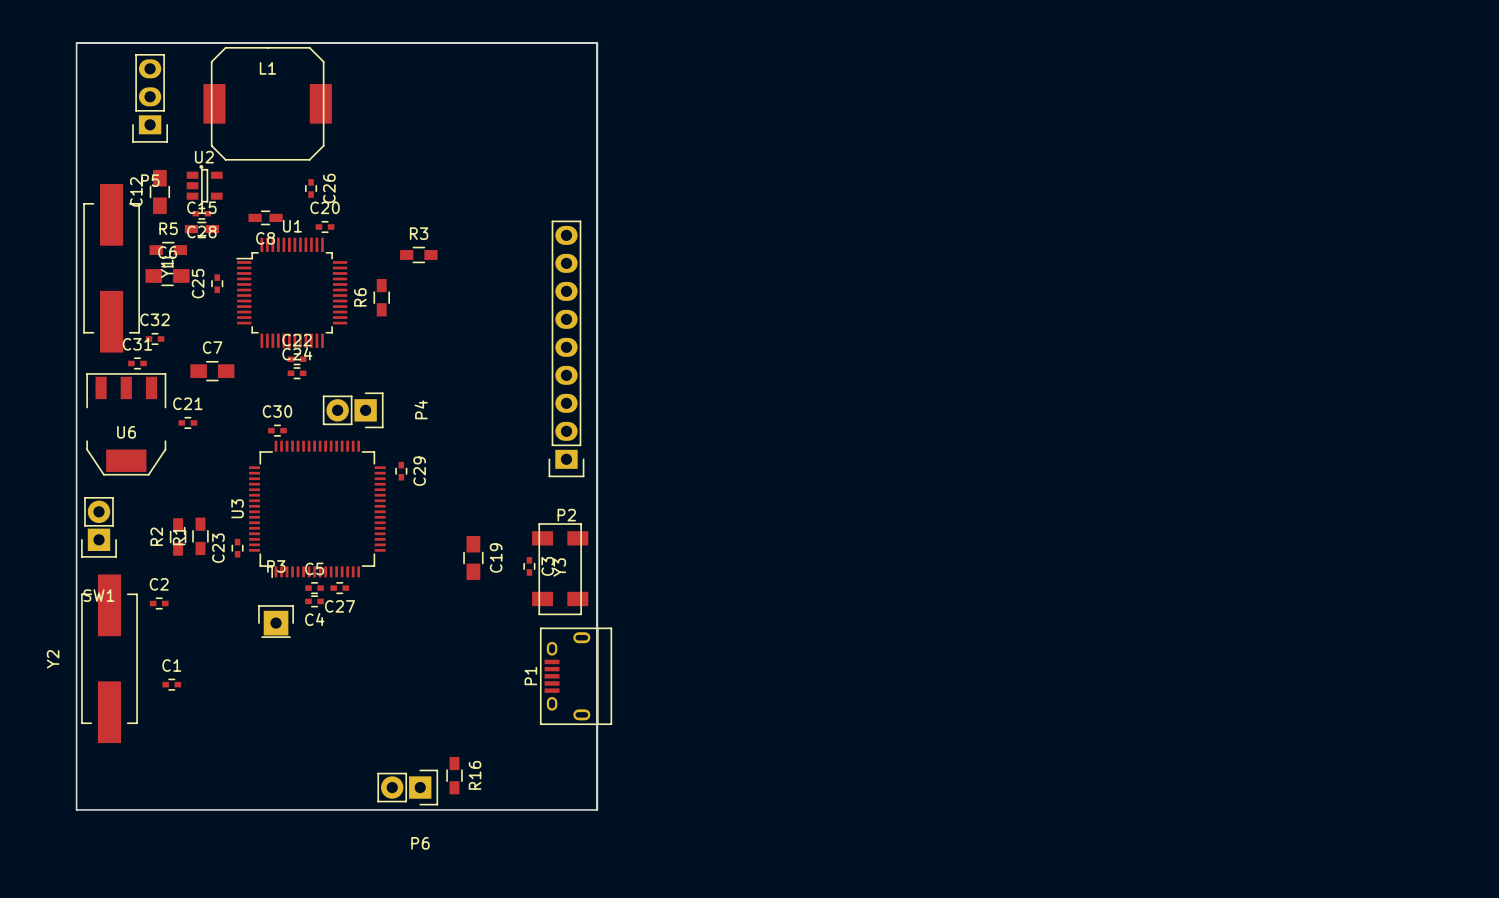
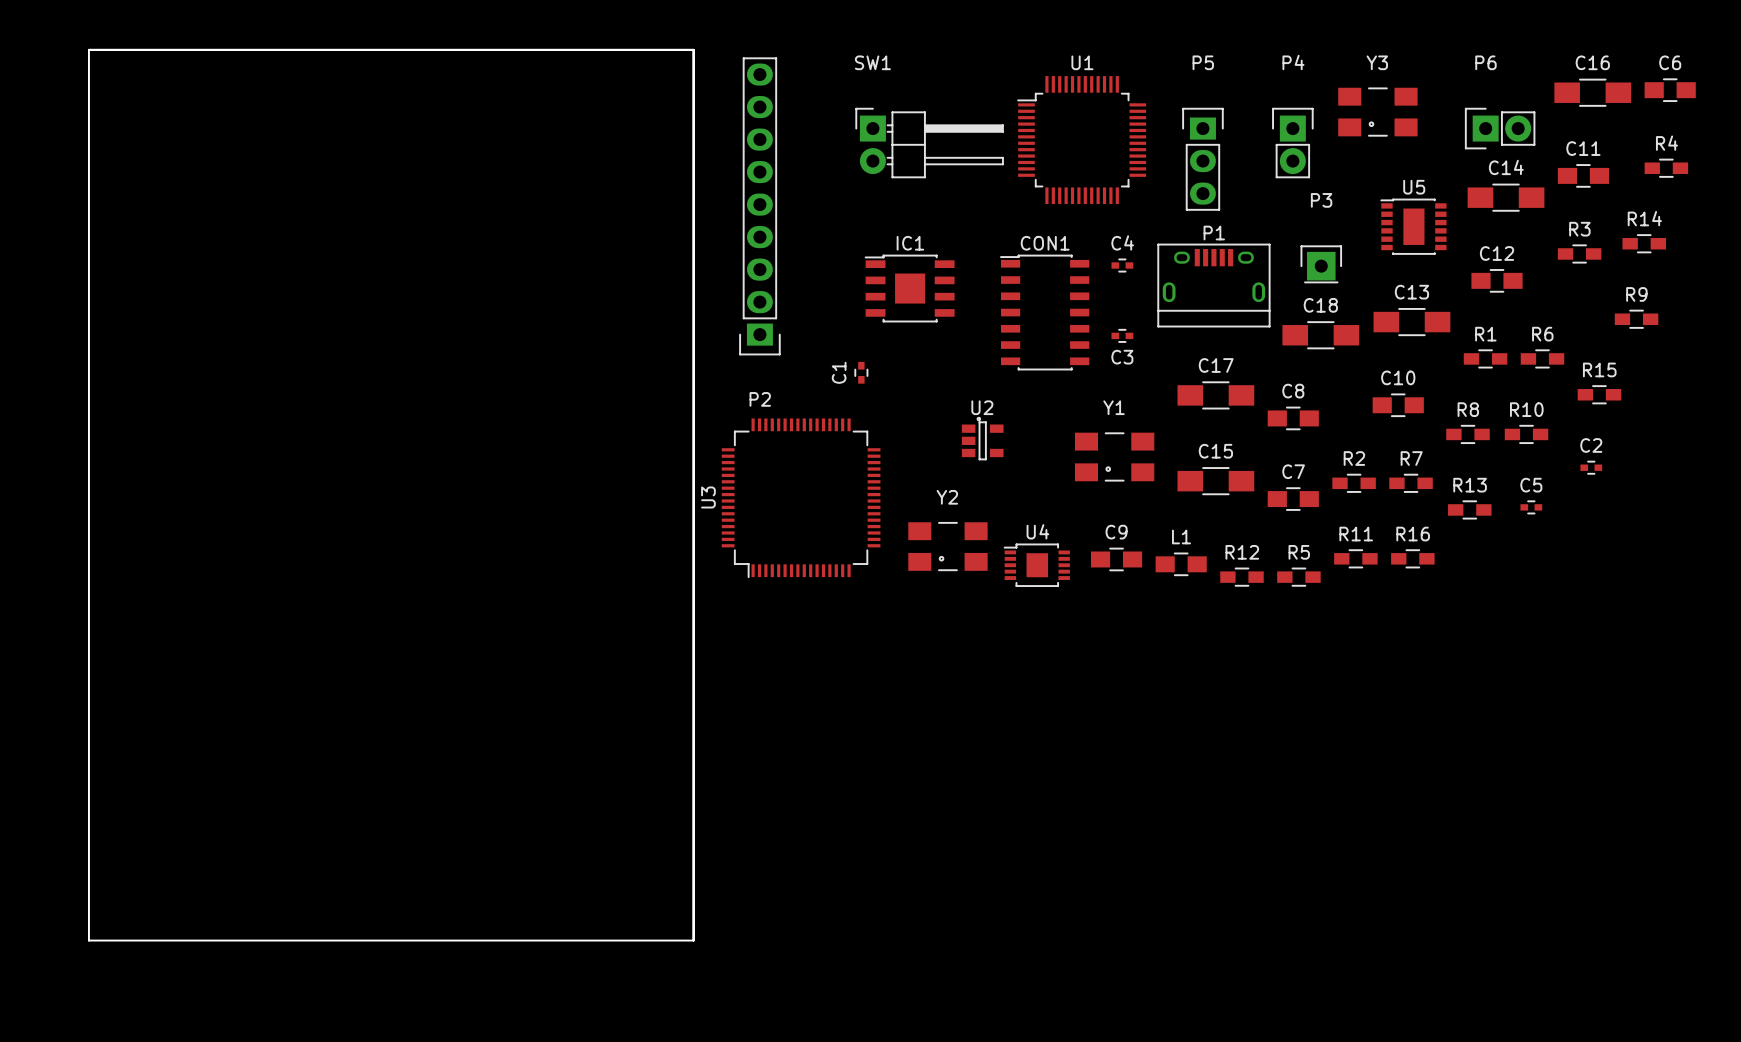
L1 footprint: [203, 47, 332, 161] -> [1155, 552, 1207, 577]
C16: none -> (1592, 92)
P5 rotation: 0° (150, 98) -> 180° (1202, 159)
P5 position: (150, 98) -> (1202, 159)
R4: none -> (1666, 168)
C11: none -> (1583, 175)
C14: none -> (1506, 197)
Y1 footprint: [83, 183, 140, 353] -> [1074, 432, 1155, 482]
U2 position: (204, 183) -> (982, 438)
C26: (311, 188) -> none
C12 rotation: 0° (159, 191) -> 90° clockwise (1497, 280)
C12 position: (159, 191) -> (1497, 280)
U5: none -> (1413, 226)
R14: none -> (1644, 243)
C8 footprint: [248, 210, 283, 226] -> [1267, 406, 1319, 431]
C28: (201, 213) -> none
C15 footprint: [184, 221, 219, 237] -> [1177, 467, 1255, 496]
C20: (325, 226) -> none
C8 name position: C8 (265, 238) -> C8 (1293, 391)
IC1: none -> (909, 288)
R5 position: (168, 250) -> (1298, 577)
R3 position: (418, 254) -> (1579, 253)
Y1 name position: Y1 (167, 268) -> Y1 (1114, 407)
CON1: none -> (1044, 312)
R9: none -> (1636, 319)
C6 position: (167, 275) -> (1670, 90)
C13: none -> (1411, 322)
C25: (217, 283) -> none
C18: none -> (1320, 335)
U1 position: (291, 292) -> (1081, 140)
R6 rotation: 0° (381, 297) -> 90° clockwise (1542, 358)
R6 position: (381, 297) -> (1542, 358)
C32: (154, 338) -> none
R15: none -> (1599, 394)
C17: none -> (1215, 395)
P2 position: (566, 348) -> (759, 206)
C10: none -> (1398, 405)
C22: (297, 359) -> none
C31: (137, 363) -> none
C7 position: (212, 371) -> (1293, 499)
C24: (297, 373) -> none
R8: none -> (1467, 434)
R10: none -> (1526, 434)
P4 rotation: 0° (353, 410) -> 90° counterclockwise (1292, 143)
P4 position: (353, 410) -> (1292, 143)
R7: none -> (1411, 483)
C21: (187, 422) -> none
U6: (126, 424) -> none
C30: (277, 430) -> none
R13: none -> (1469, 509)
C29: (401, 471) -> none
C9: none -> (1116, 559)
R11: none -> (1355, 558)
U4: none -> (1036, 565)
SW1 footprint: [81, 496, 117, 558] -> [855, 107, 1004, 179]
R12: none -> (1241, 577)
U3 position: (317, 509) -> (801, 498)
Y3 footprint: [532, 523, 589, 616] -> [1338, 87, 1418, 137]
R1 rotation: 0° (200, 536) -> 90° clockwise (1485, 358)
R1 position: (200, 536) -> (1485, 358)
R2 rotation: 0° (178, 537) -> 90° clockwise (1354, 483)
R2 position: (178, 537) -> (1354, 483)
C23: (237, 548) -> none
C19: (473, 558) -> none
C3 rotation: 0° (529, 566) -> 90° clockwise (1122, 335)
C3 position: (529, 566) -> (1122, 335)
Y3 name position: Y3 (559, 567) -> Y3 (1377, 62)
Y2 footprint: [81, 574, 138, 744] -> [908, 521, 988, 572]
C5 position: (314, 588) -> (1531, 507)
C27: (339, 588) -> none
SW1 name position: SW1 (99, 595) -> SW1 (872, 62)
C4 position: (314, 601) -> (1122, 265)
C2 position: (159, 603) -> (1591, 467)
C4 name position: C4 (314, 619) -> C4 (1122, 242)
P3 position: (276, 621) -> (1321, 264)
Y2 name position: Y2 (53, 659) -> Y2 (947, 497)
C1 name position: C1 (171, 665) -> C1 (839, 372)
P1 rotation: 0° (576, 676) -> 90° clockwise (1213, 285)
P1 position: (576, 676) -> (1213, 285)
C1 rotation: 0° (171, 684) -> 90° clockwise (861, 372)
C1 position: (171, 684) -> (861, 372)
R16 rotation: 0° (454, 775) -> 90° clockwise (1412, 558)
R16 position: (454, 775) -> (1412, 558)
R16 name position: R16 (475, 775) -> R16 (1413, 534)
P6 rotation: 0° (407, 787) -> 180° (1500, 128)
P6 position: (407, 787) -> (1500, 128)

